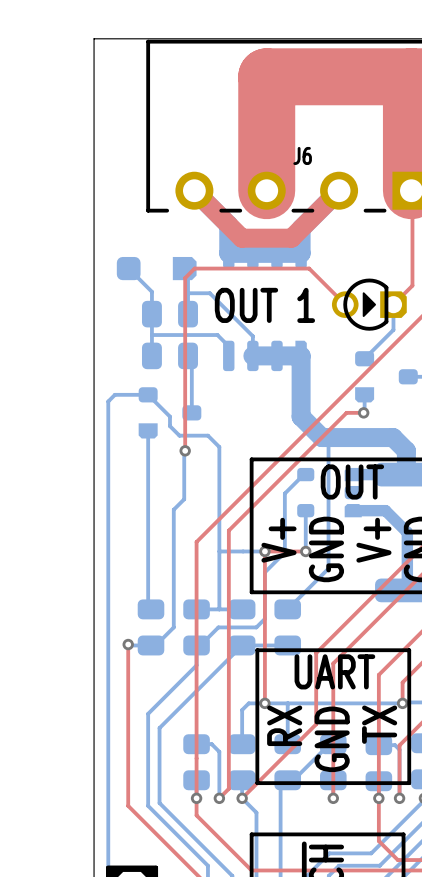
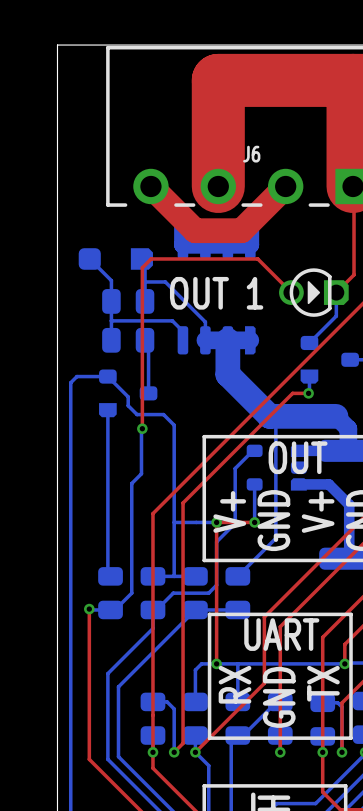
top track width: thin (194, 190) (241, 238) (291, 238) (339, 190) -> thick (150, 186) (195, 230) (241, 230) (285, 186)
bottom track: (301, 355) (301, 416) -> (227, 340) (227, 374) (250, 396)
bottom track width: thin (301, 416) (321, 437) (393, 437) -> thick (250, 396) (269, 416) (335, 416)

